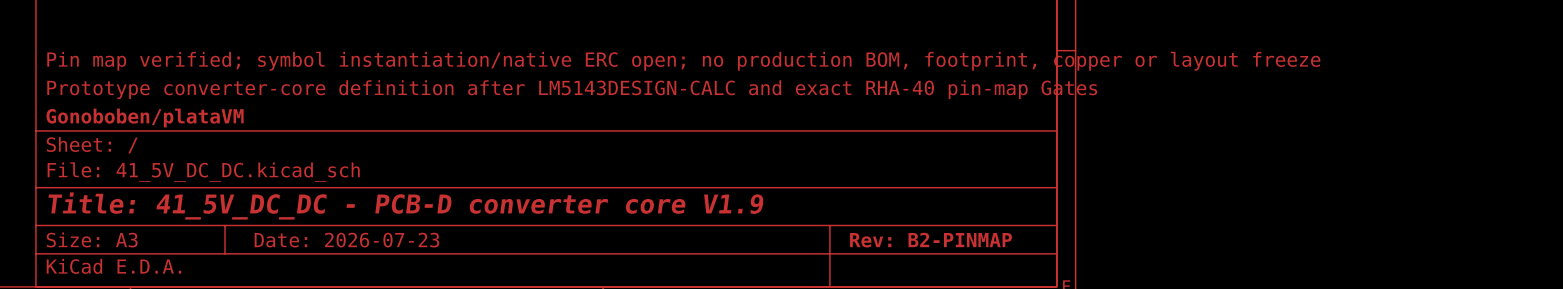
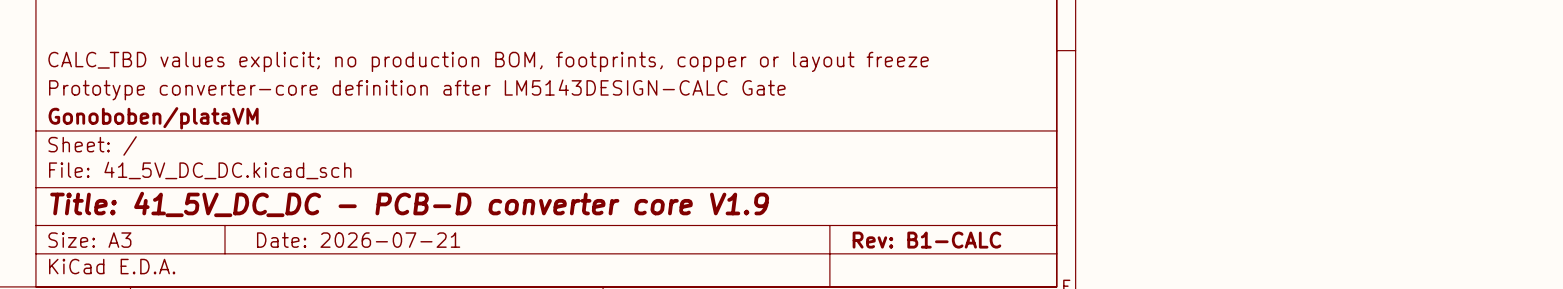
title block: Pin map verified; symbol instantiation/native ERC open; no production BOM, footprint, copper or layout freeze (683, 61) -> CALC_TBD values explicit; no production BOM, footprints, copper or layout freeze (488, 61)
title block: Prototype converter-core definition after LM5143DESIGN-CALC and exact RHA-40 pin-map Gates (572, 89) -> Prototype converter-core definition after LM5143DESIGN-CALC Gate (417, 89)
title block: Date: 2026-07-23 (346, 240) -> Date: 2026-07-21 (358, 240)
title block: Rev: B2-PINMAP (930, 240) -> Rev: B1-CALC (926, 240)

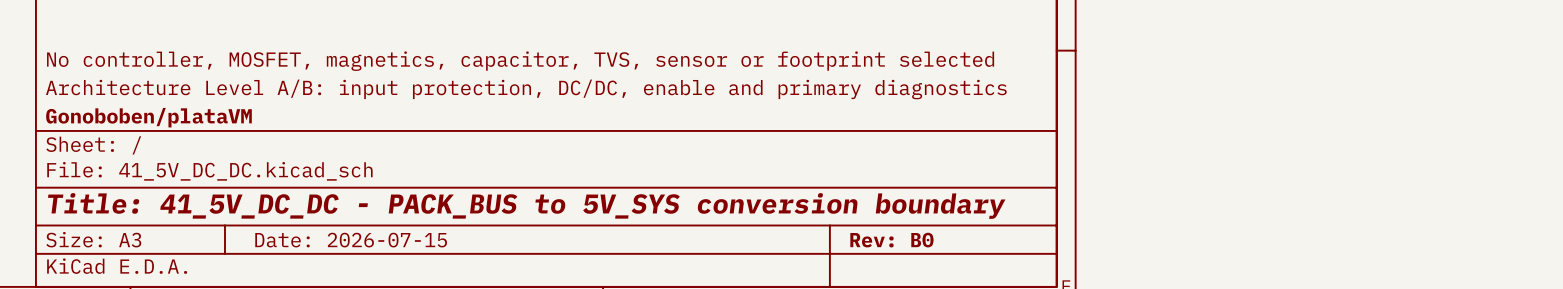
title block: CALC_TBD values explicit; no production BOM, footprints, copper or layout freeze (488, 61) -> No controller, MOSFET, magnetics, capacitor, TVS, sensor or footprint selected (520, 61)
title block: Prototype converter-core definition after LM5143DESIGN-CALC Gate (417, 89) -> Architecture Level A/B: input protection, DC/DC, enable and primary diagnostics (526, 89)
title block: Title: 41_5V_DC_DC - PCB-D converter core V1.9 (409, 204) -> Title: 41_5V_DC_DC - PACK_BUS to 5V_SYS conversion boundary (526, 205)
title block: Date: 2026-07-21 (358, 240) -> Date: 2026-07-15 (351, 240)
title block: Rev: B1-CALC (926, 240) -> Rev: B0 (891, 240)

